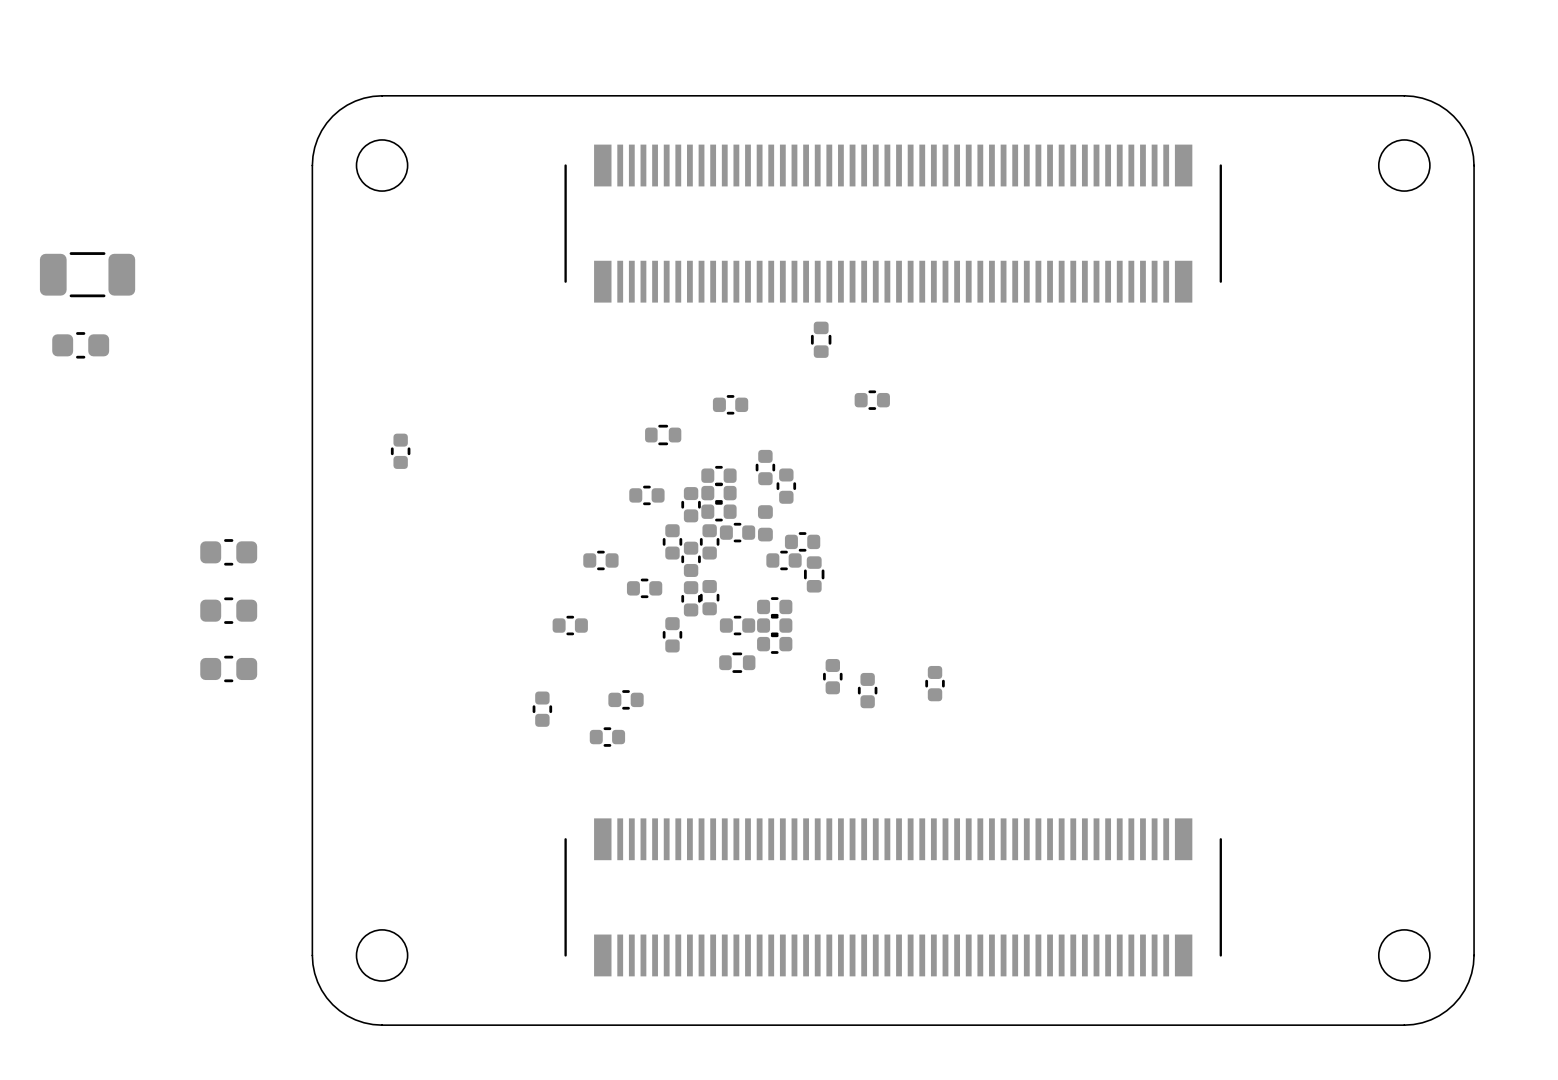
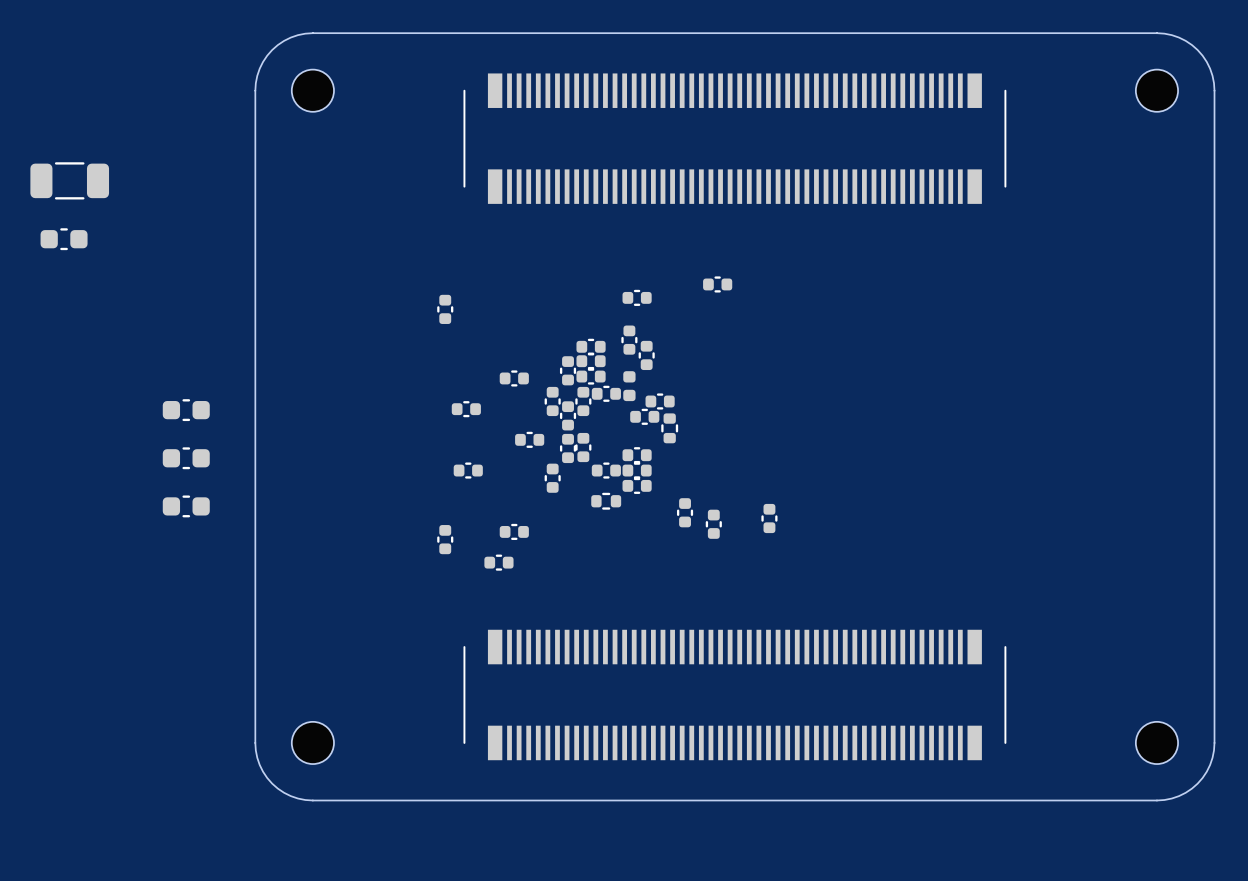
part: (821, 339) -> none
part position: (730, 404) -> (637, 297)
part: none -> (445, 309)
part: (663, 435) -> none
part: (400, 451) -> none
part: (646, 495) -> none
part: none -> (514, 378)
part: none -> (466, 409)
part: (600, 560) -> none

